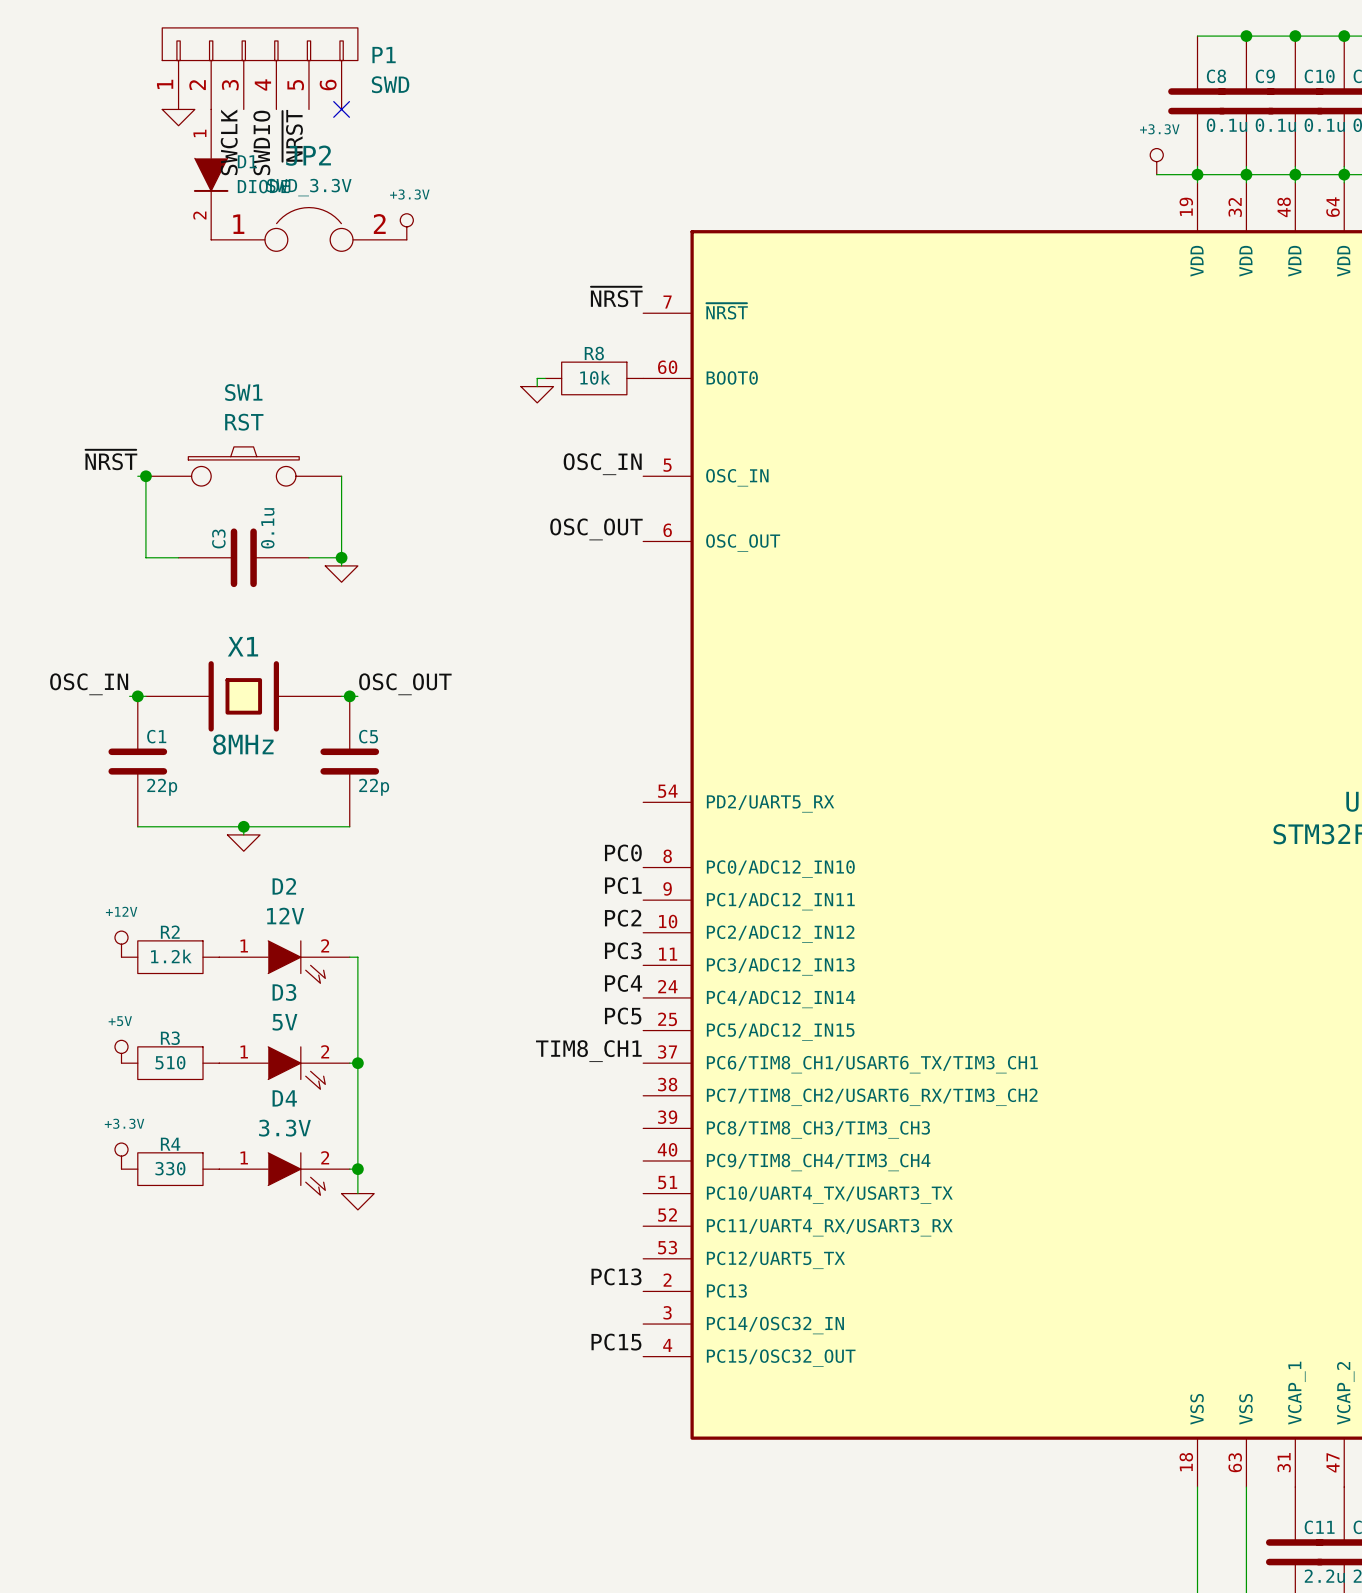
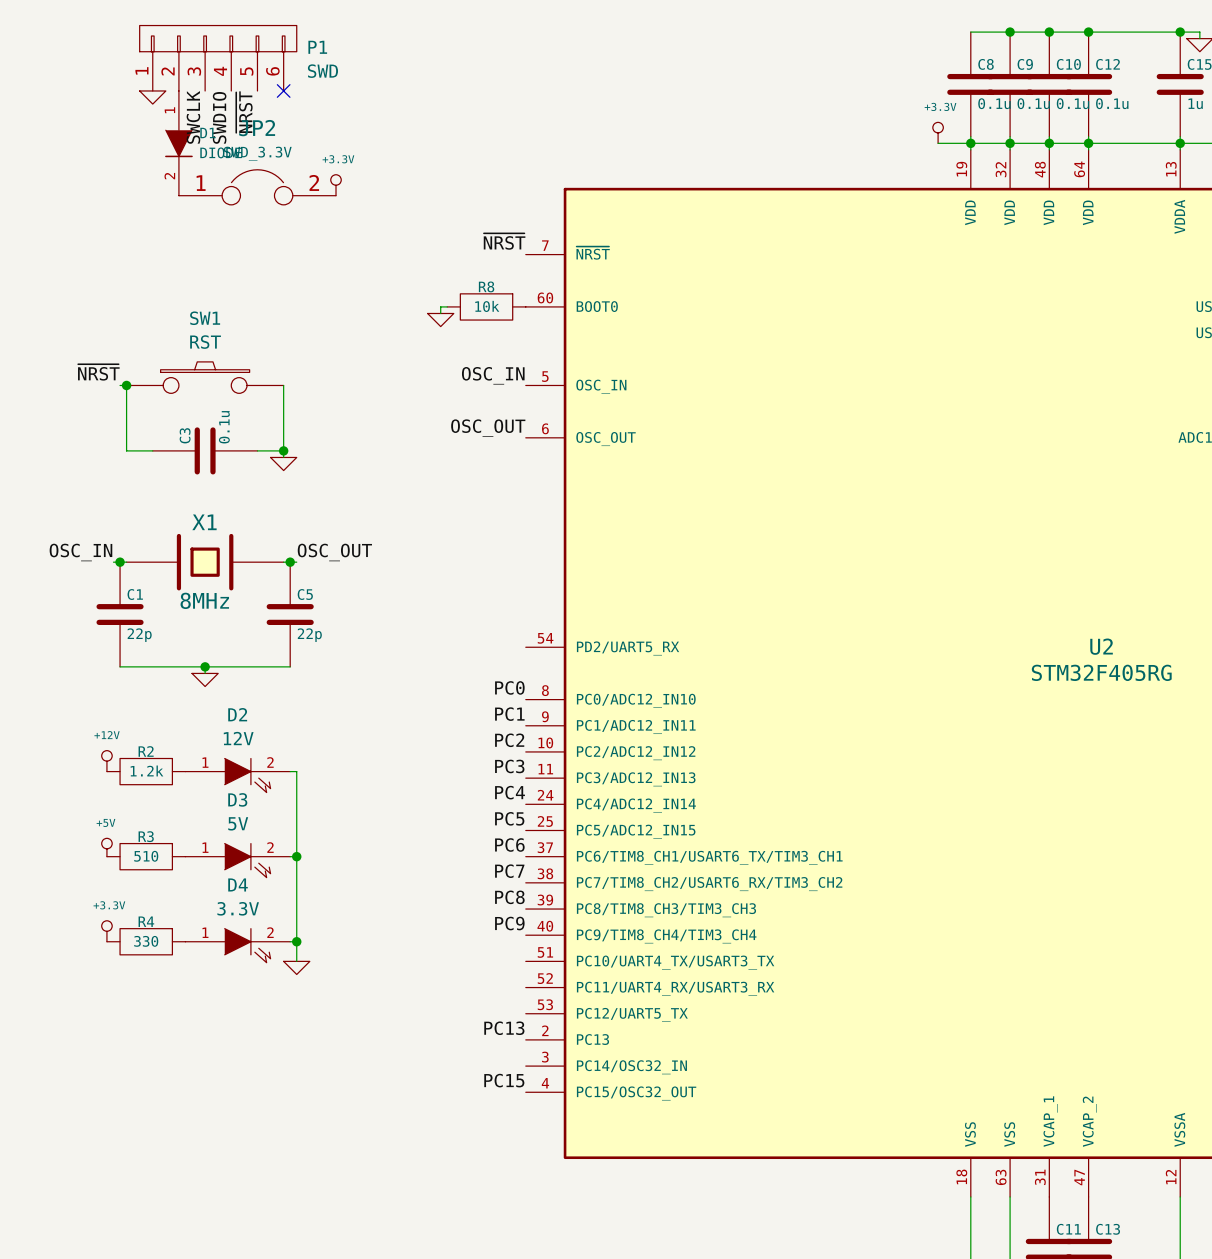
label: TIM8_CH1 (588, 1051) -> PC6 (509, 845)
label: none -> PC7 (509, 871)
label: none -> PC8 (509, 897)
label: none -> PC9 (509, 923)

